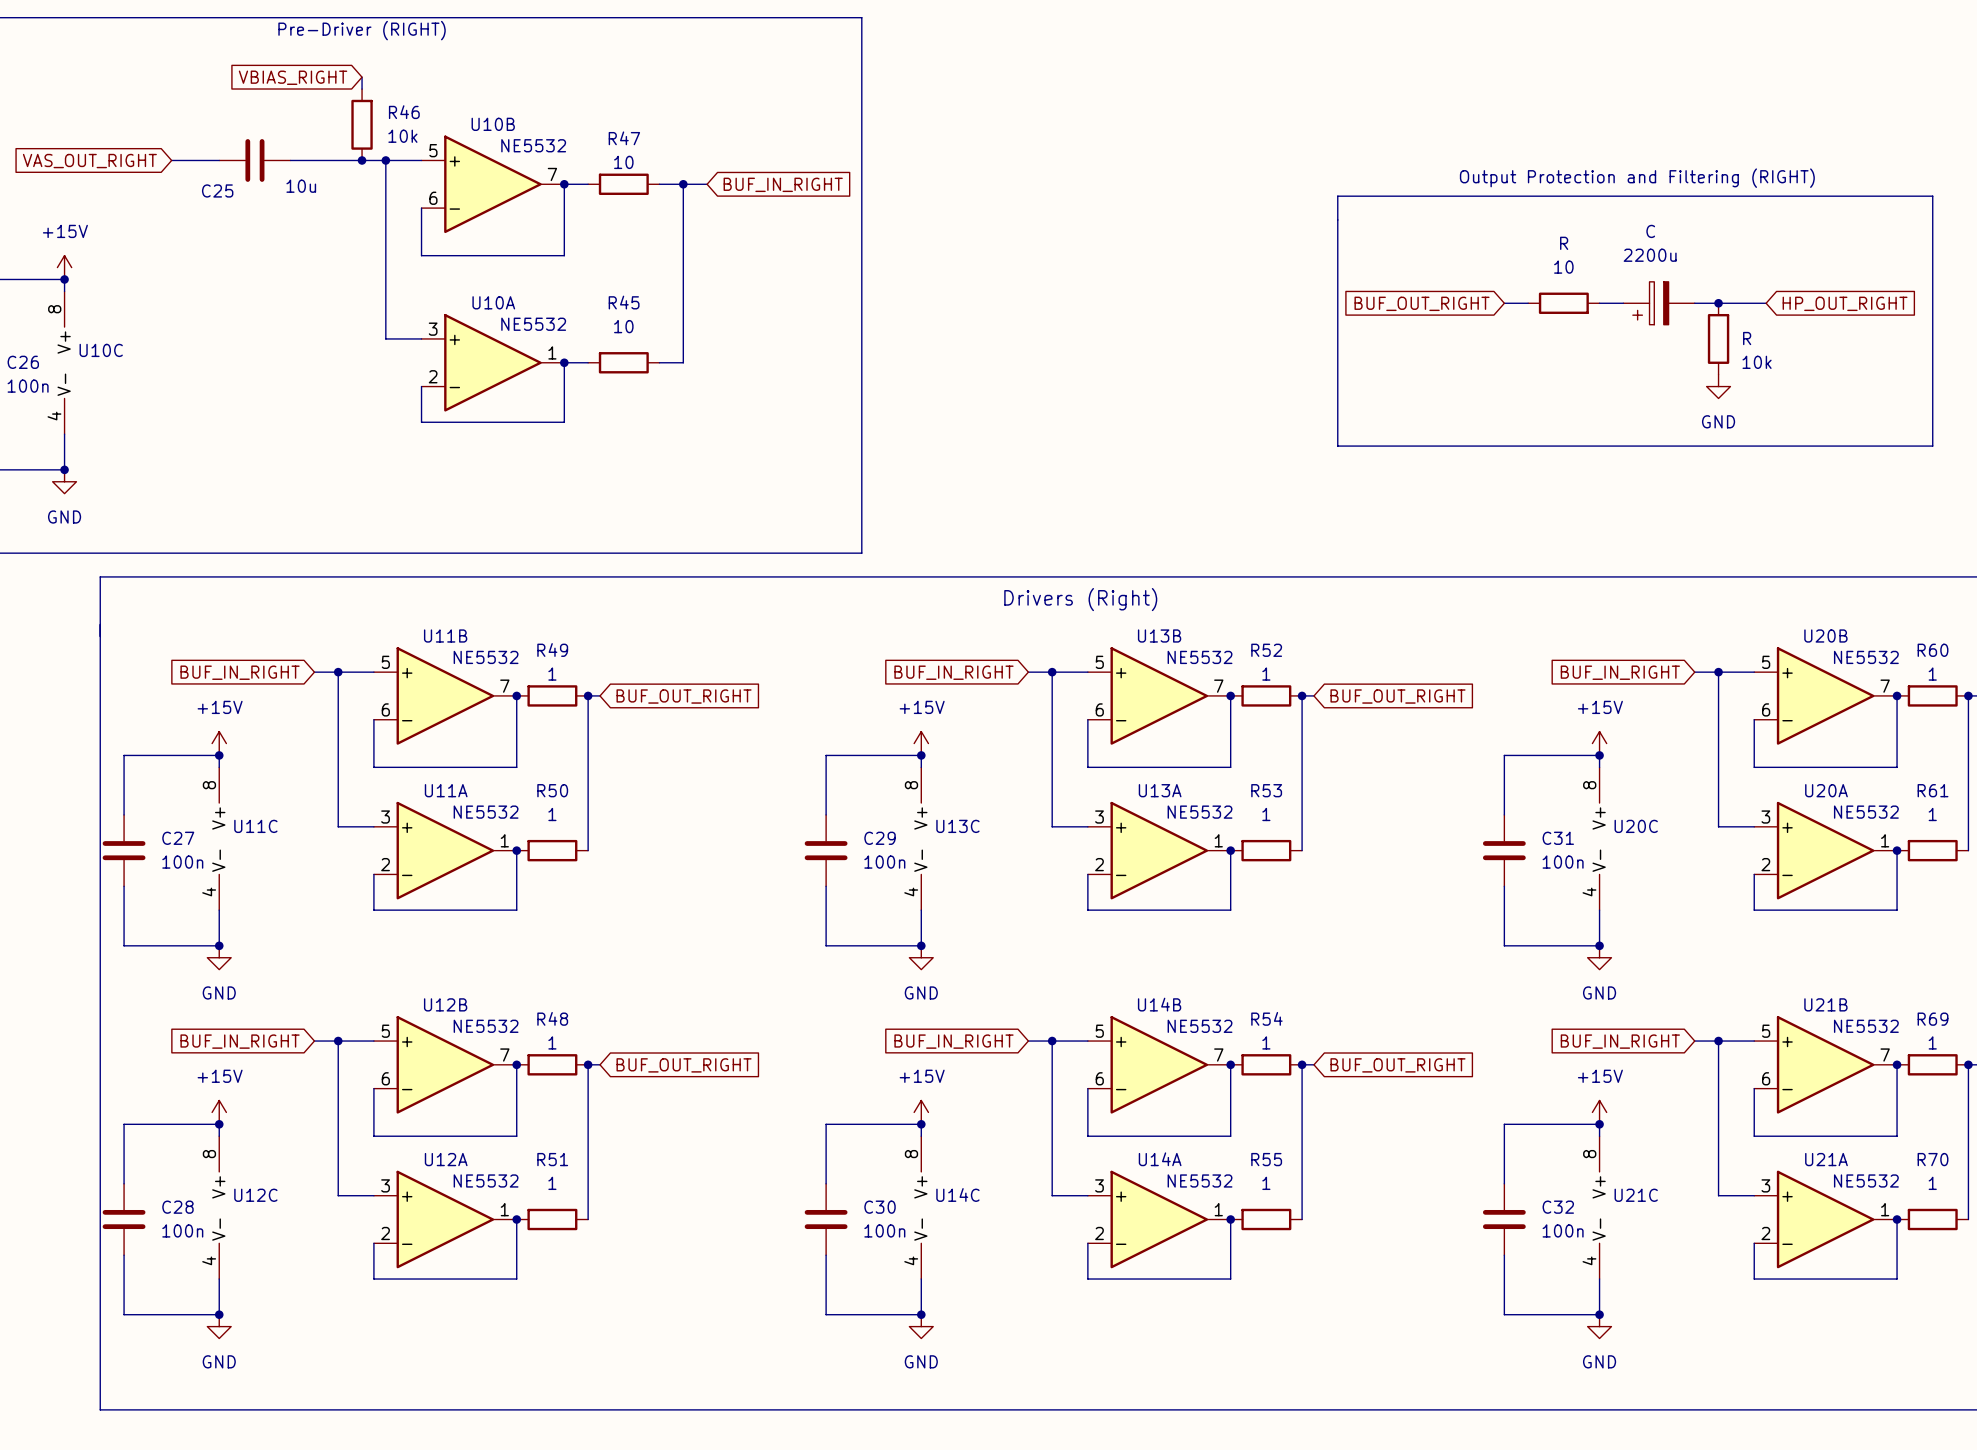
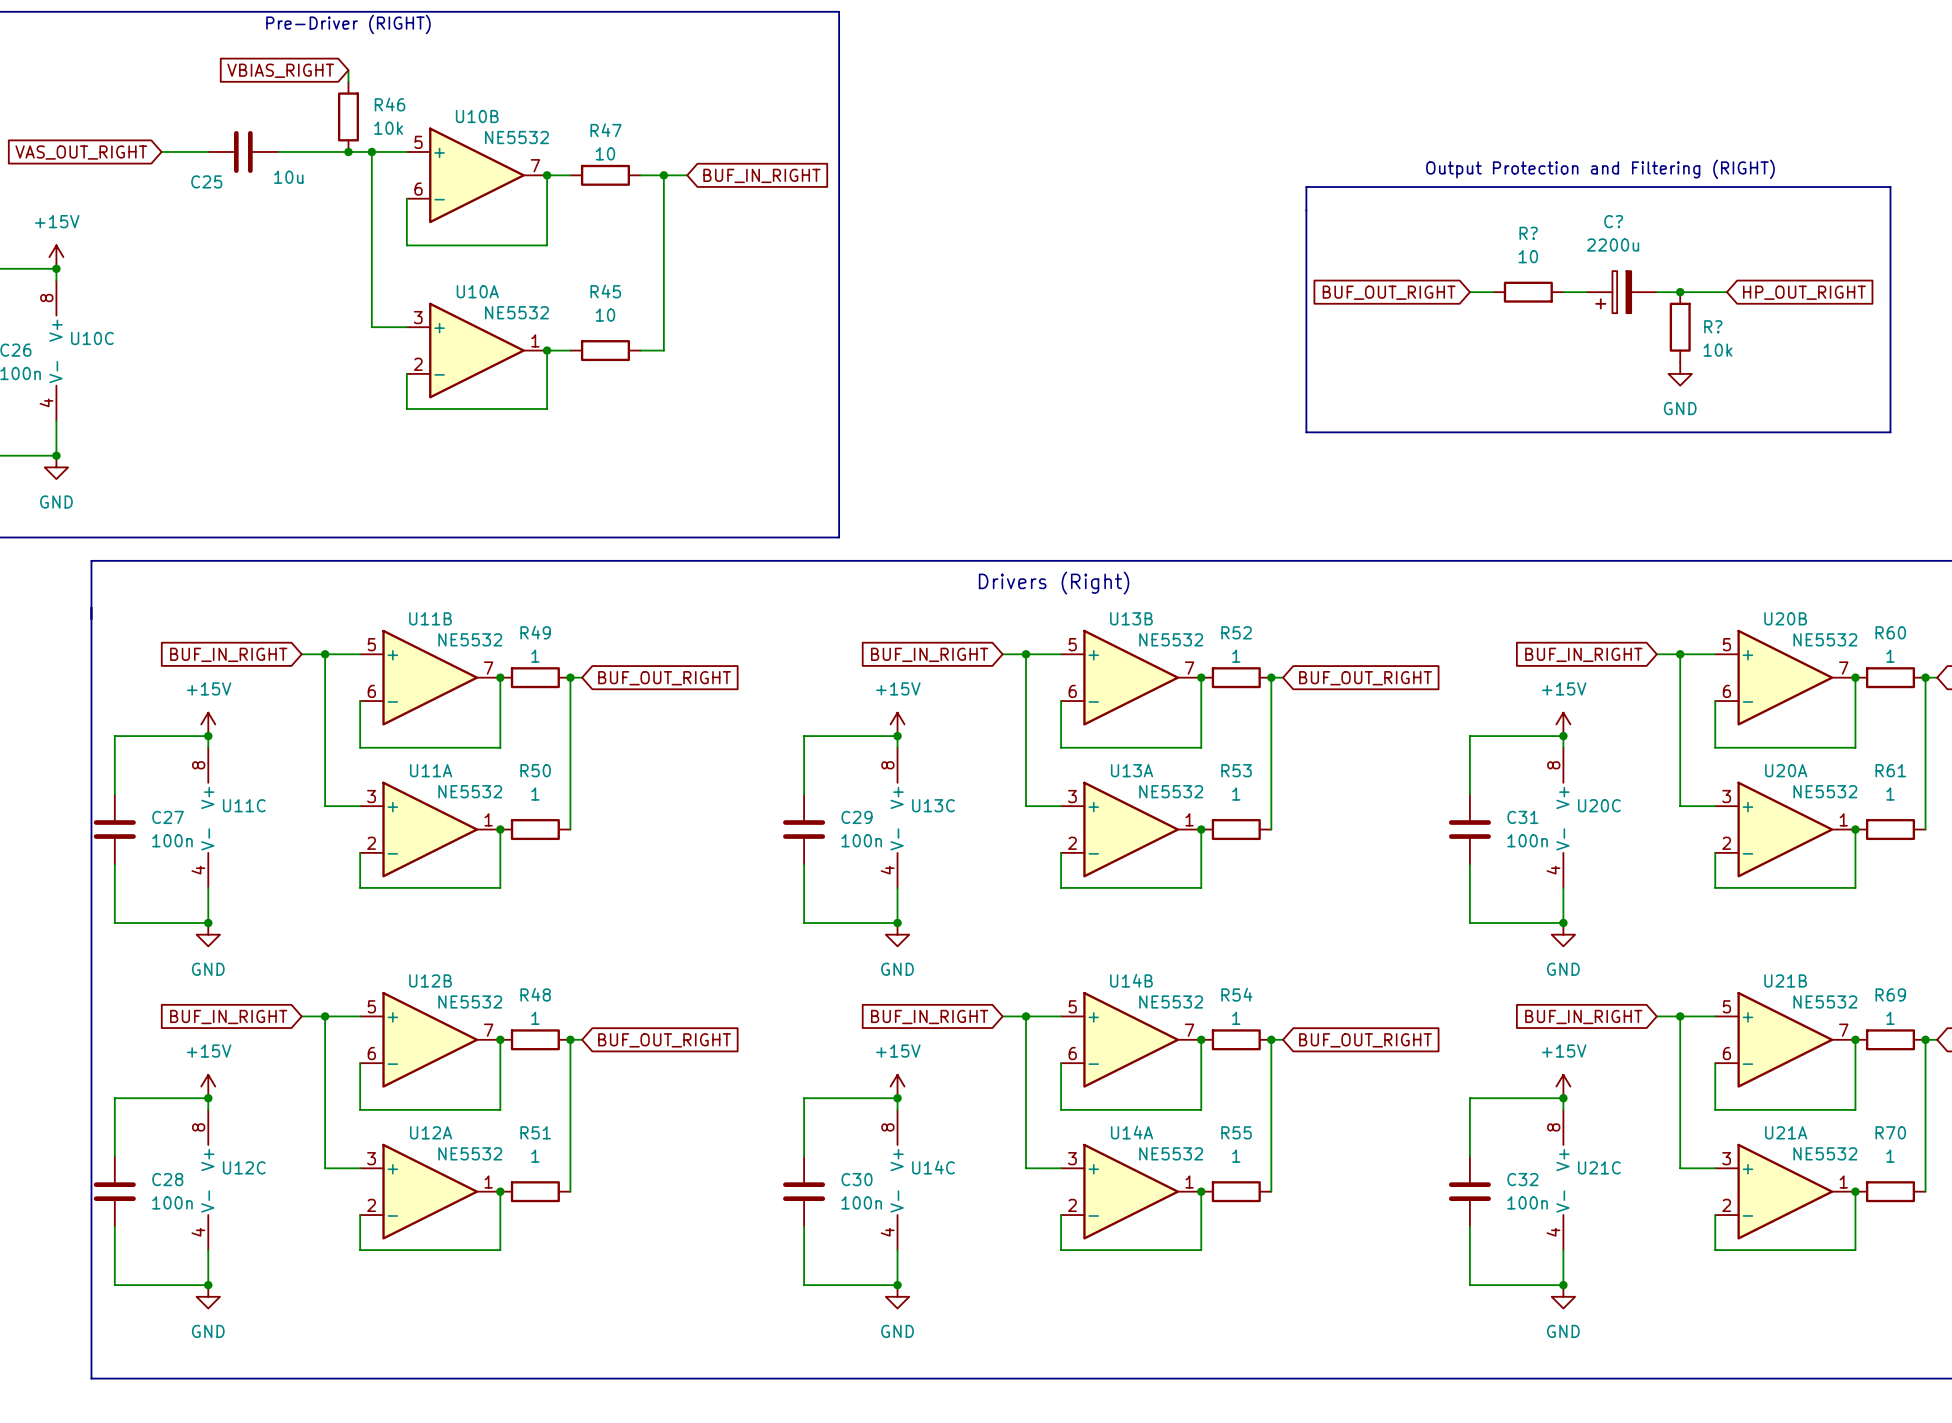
C name: C (1650, 231) -> C? (1613, 221)
R name: R (1564, 243) -> R? (1528, 233)
R name: R (1747, 338) -> R? (1713, 326)

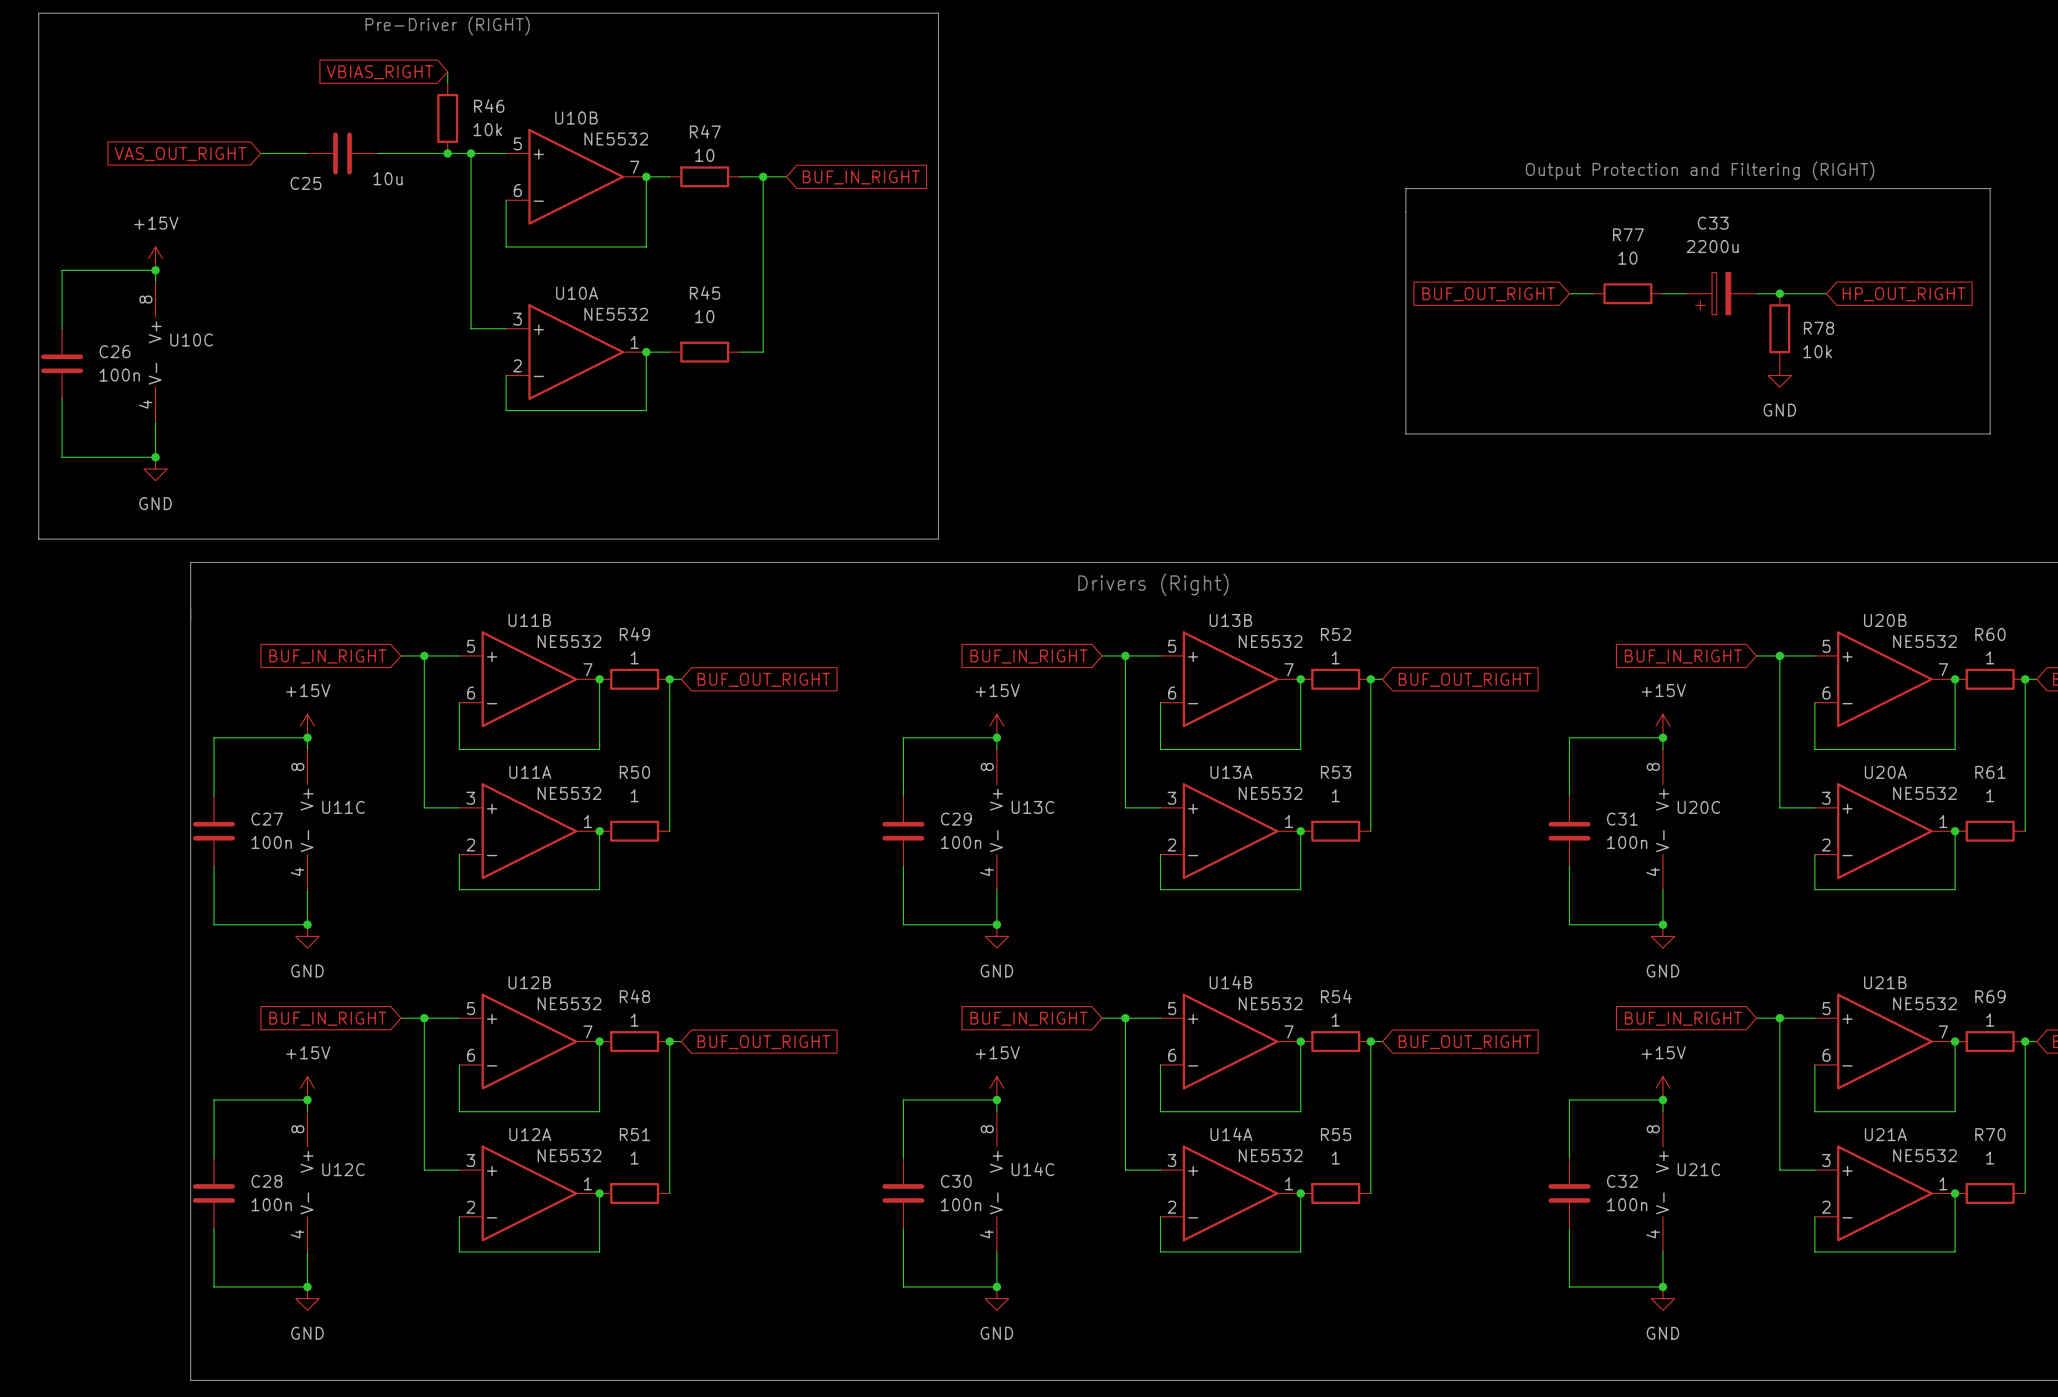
C? name: C? (1613, 221) -> C33 (1713, 223)
R? name: R? (1528, 233) -> R77 (1628, 234)
R? name: R? (1713, 326) -> R78 (1819, 328)

